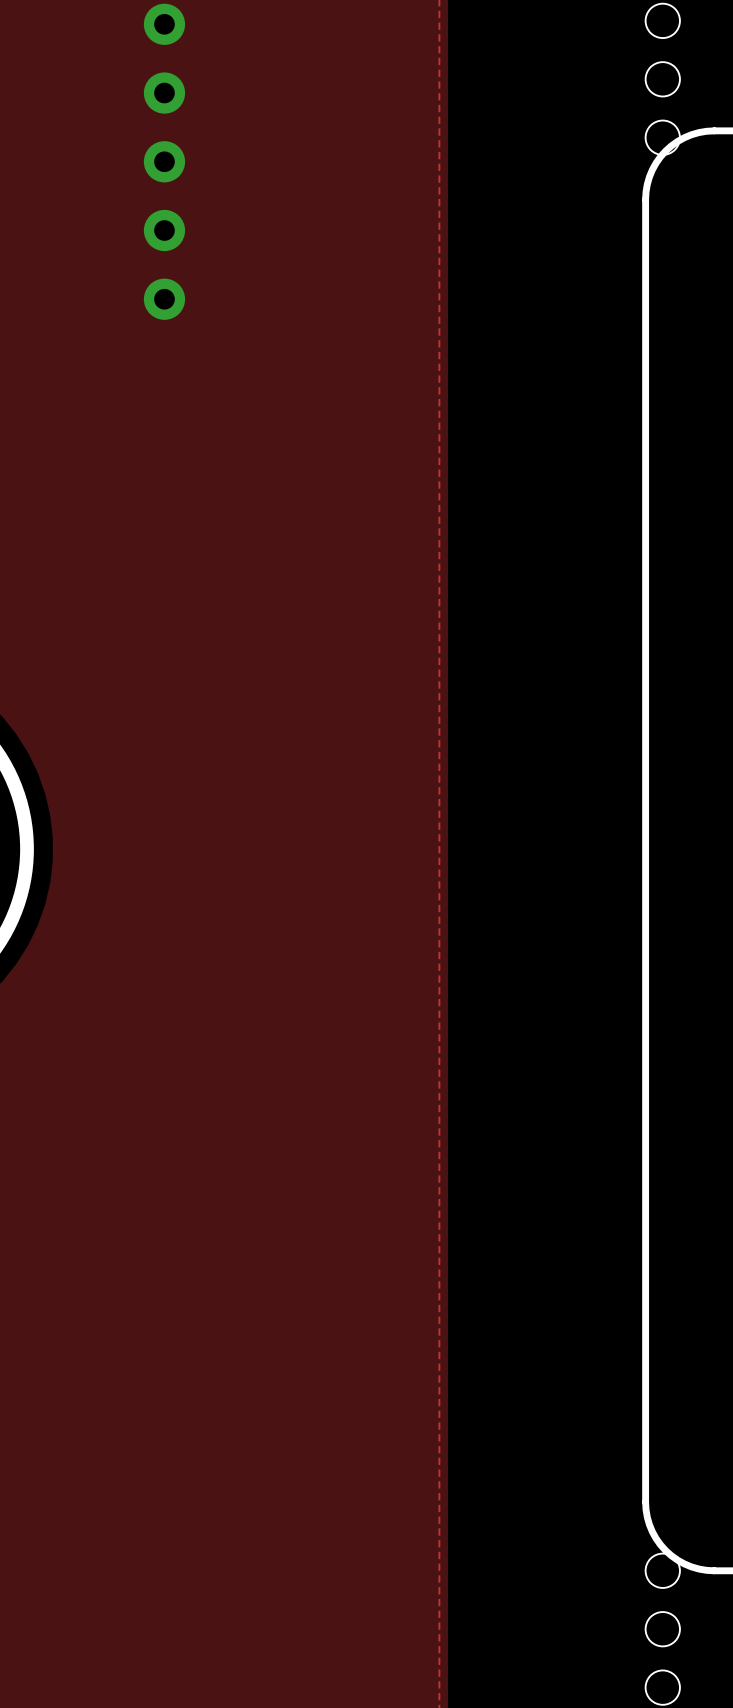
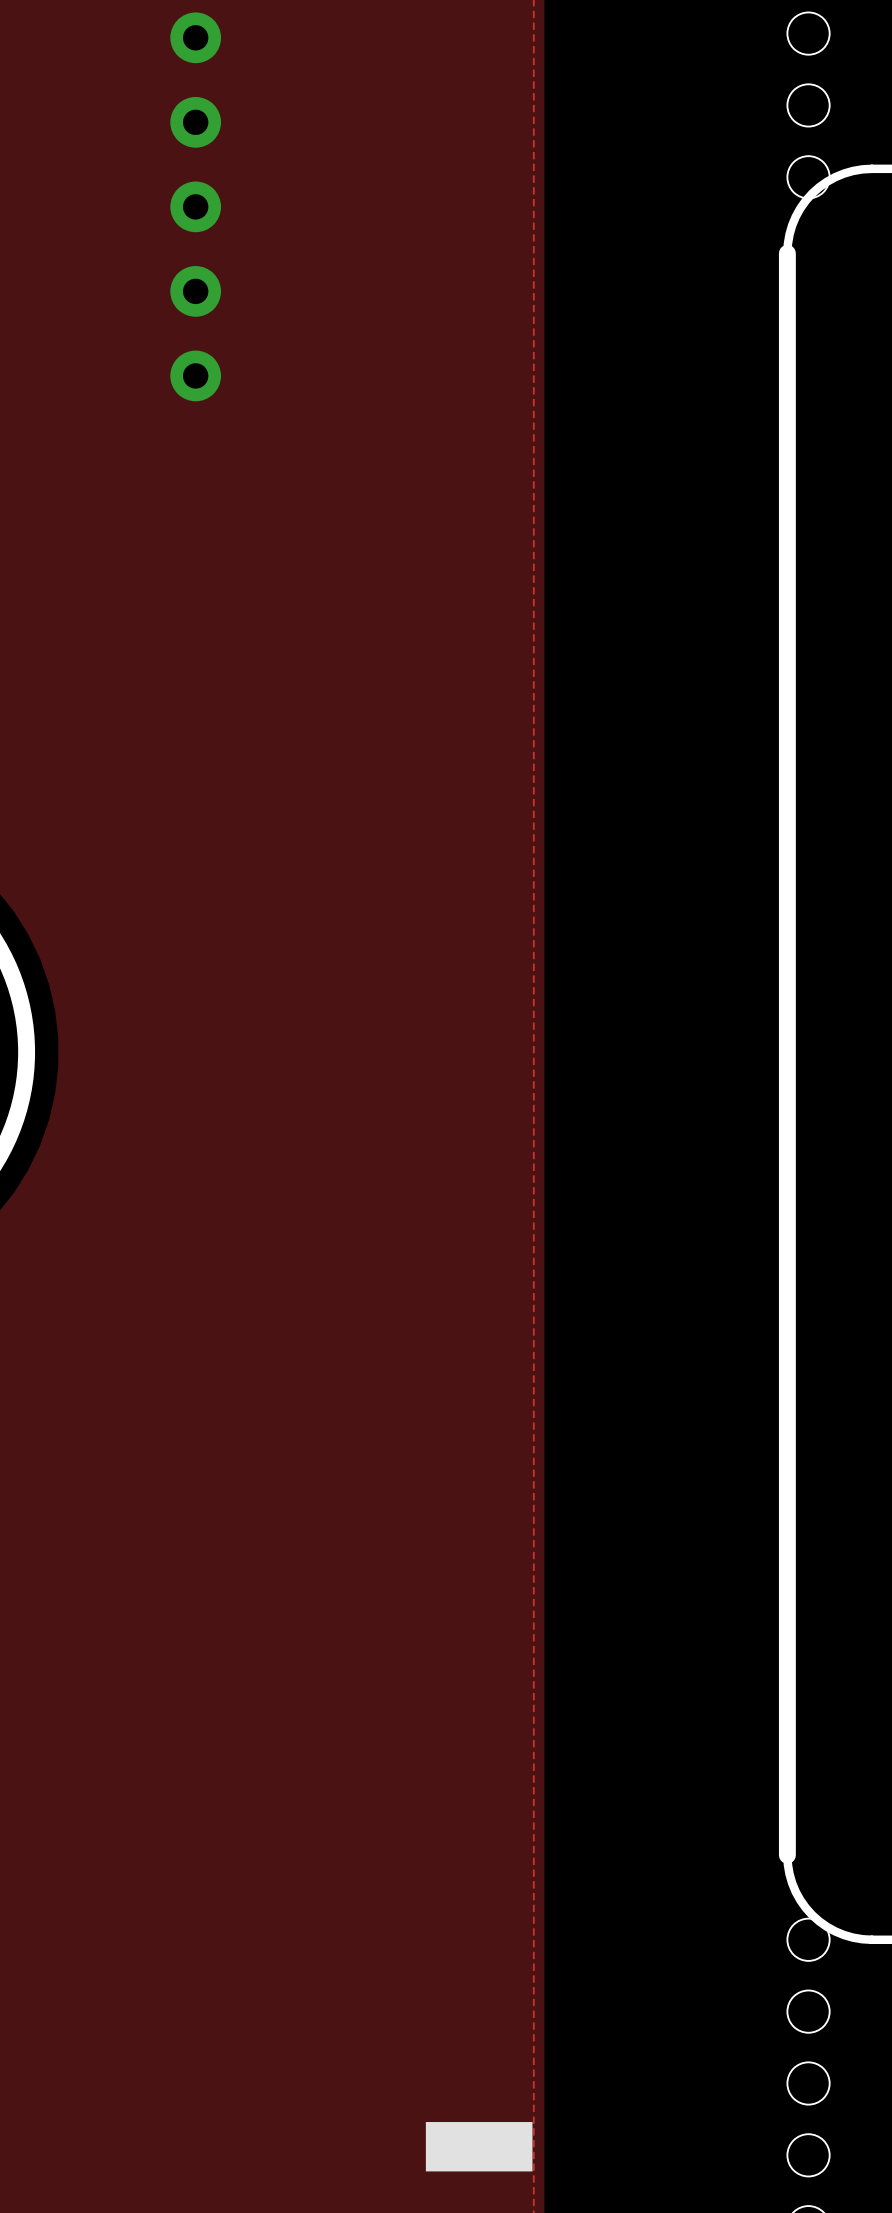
board edge width: thin (645, 199) (645, 1502) -> thick (787, 253) (787, 1855)

